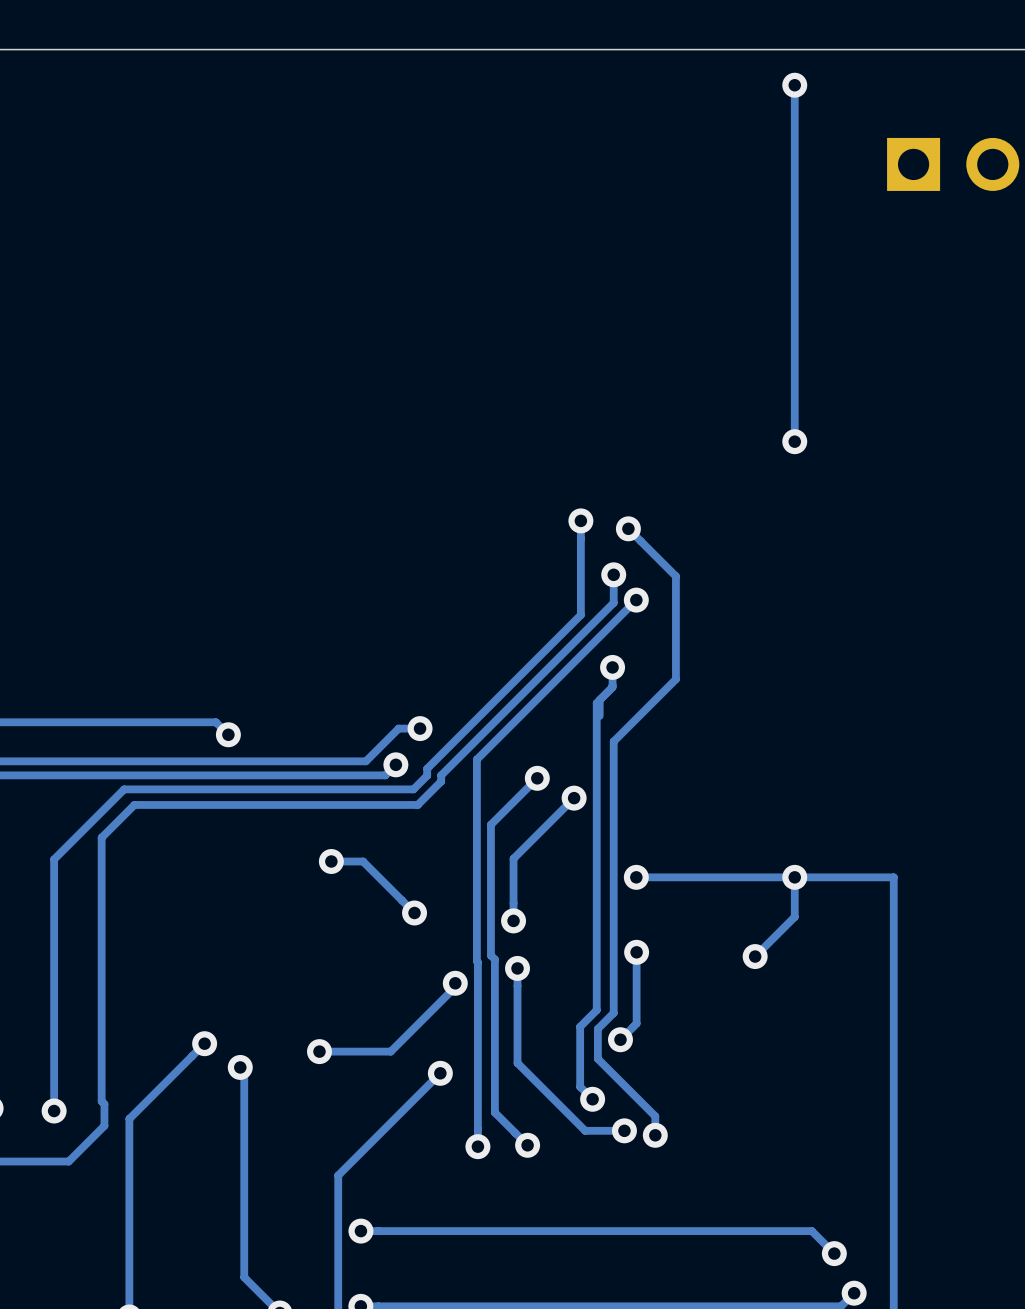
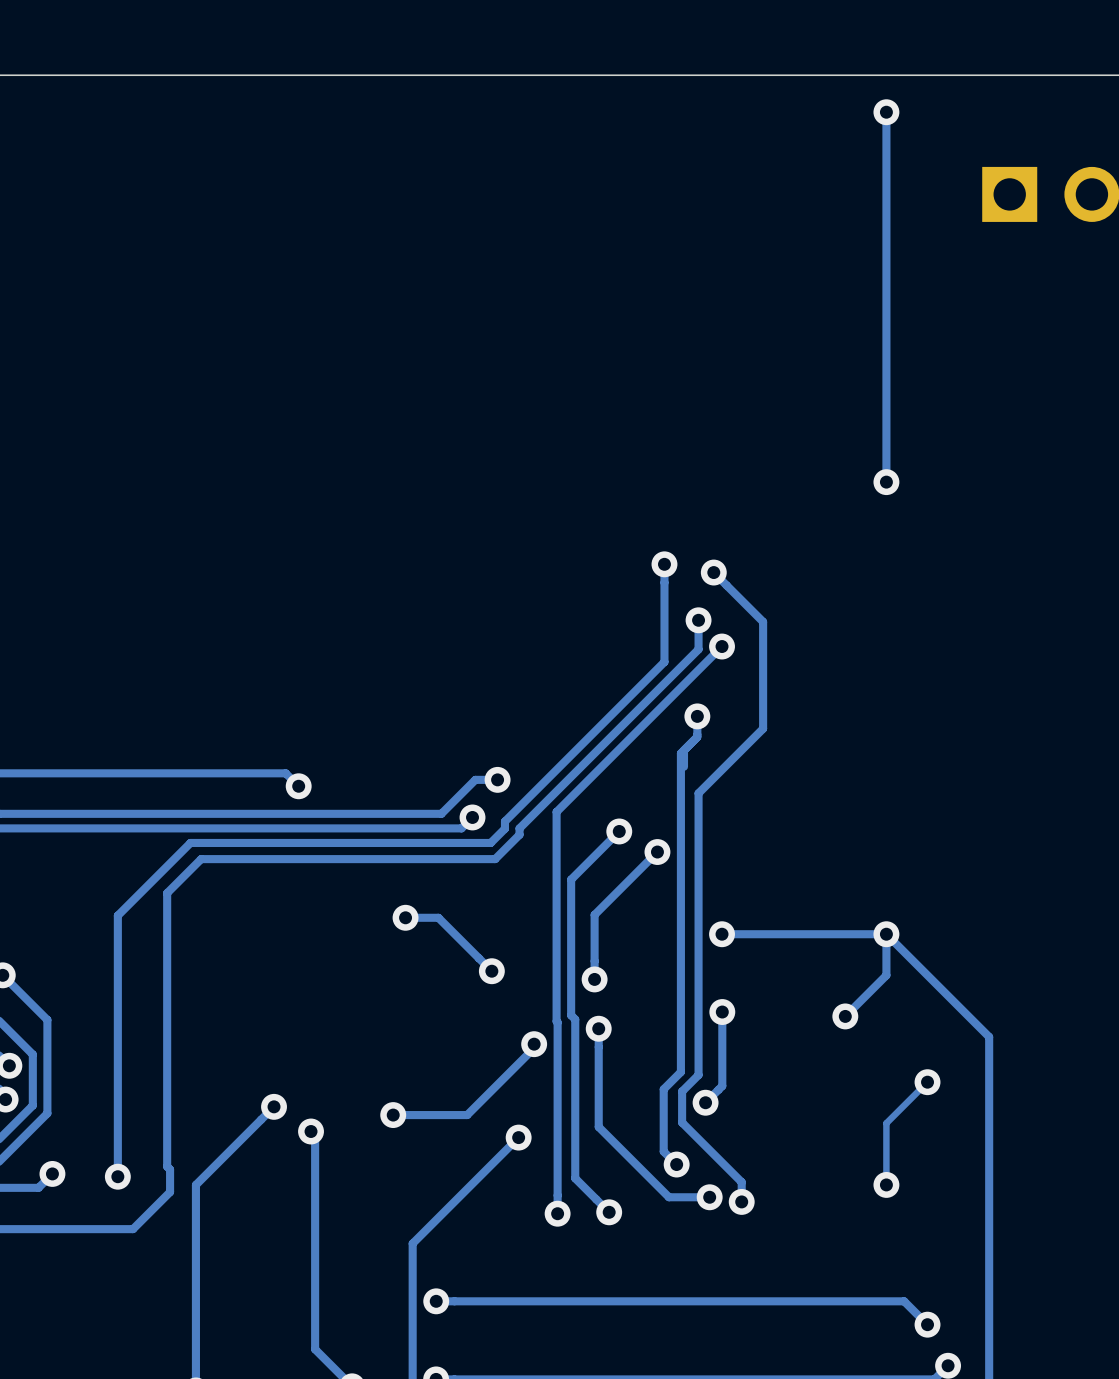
track: (794, 877) (893, 877) (893, 976) -> (886, 934) (989, 1036)
track: none -> (927, 1082) (886, 1123) (886, 1184)
via: none -> (927, 1082)
via: none -> (886, 1184)

